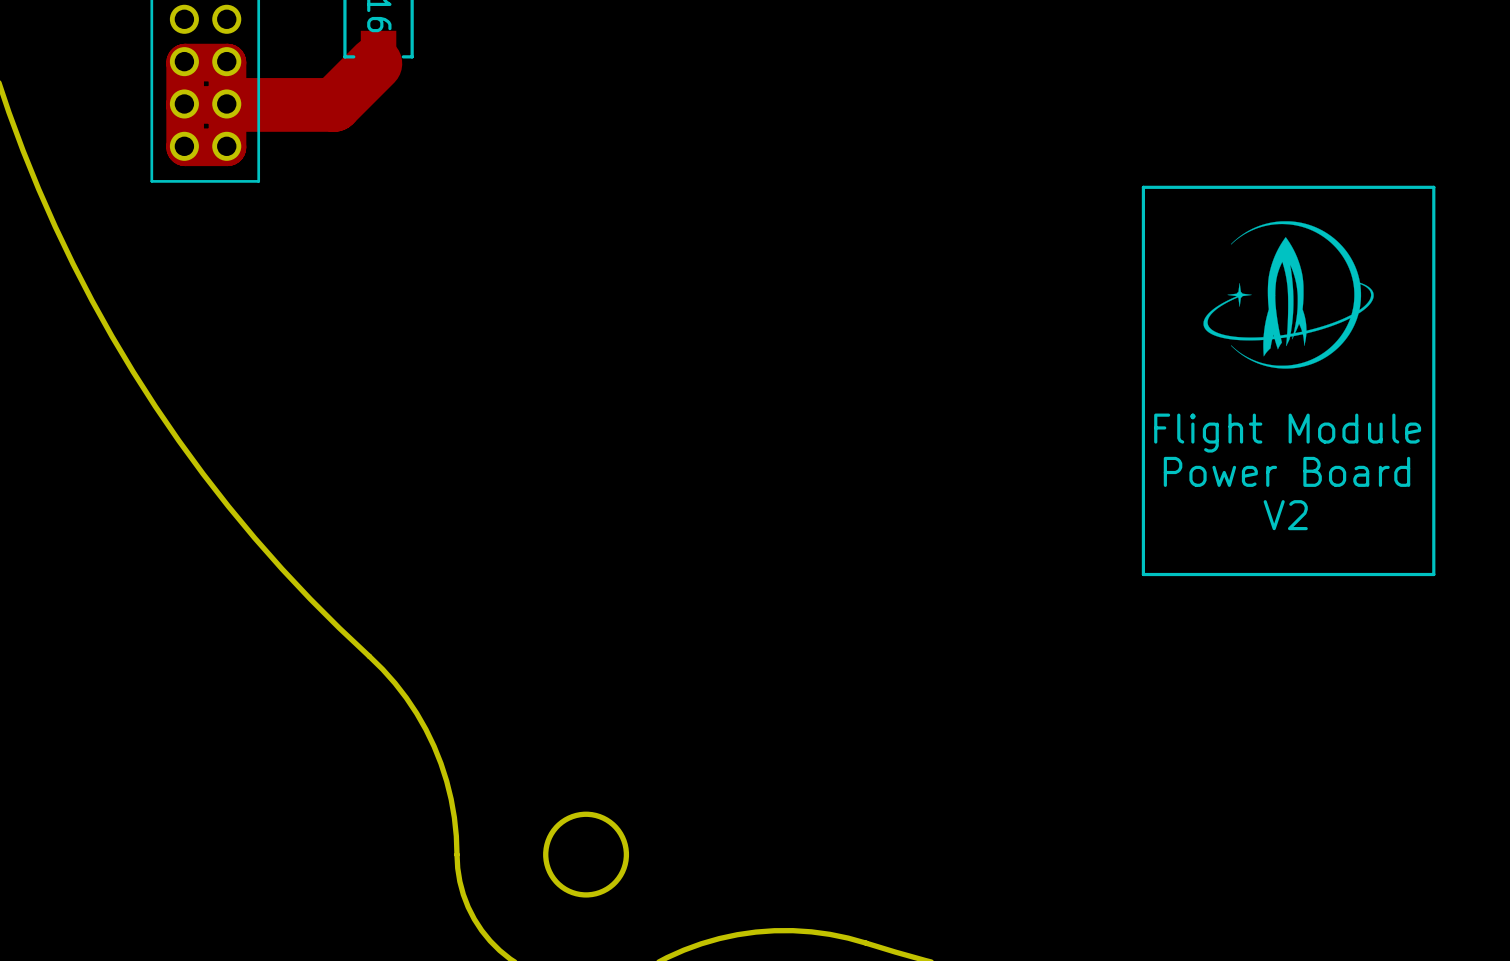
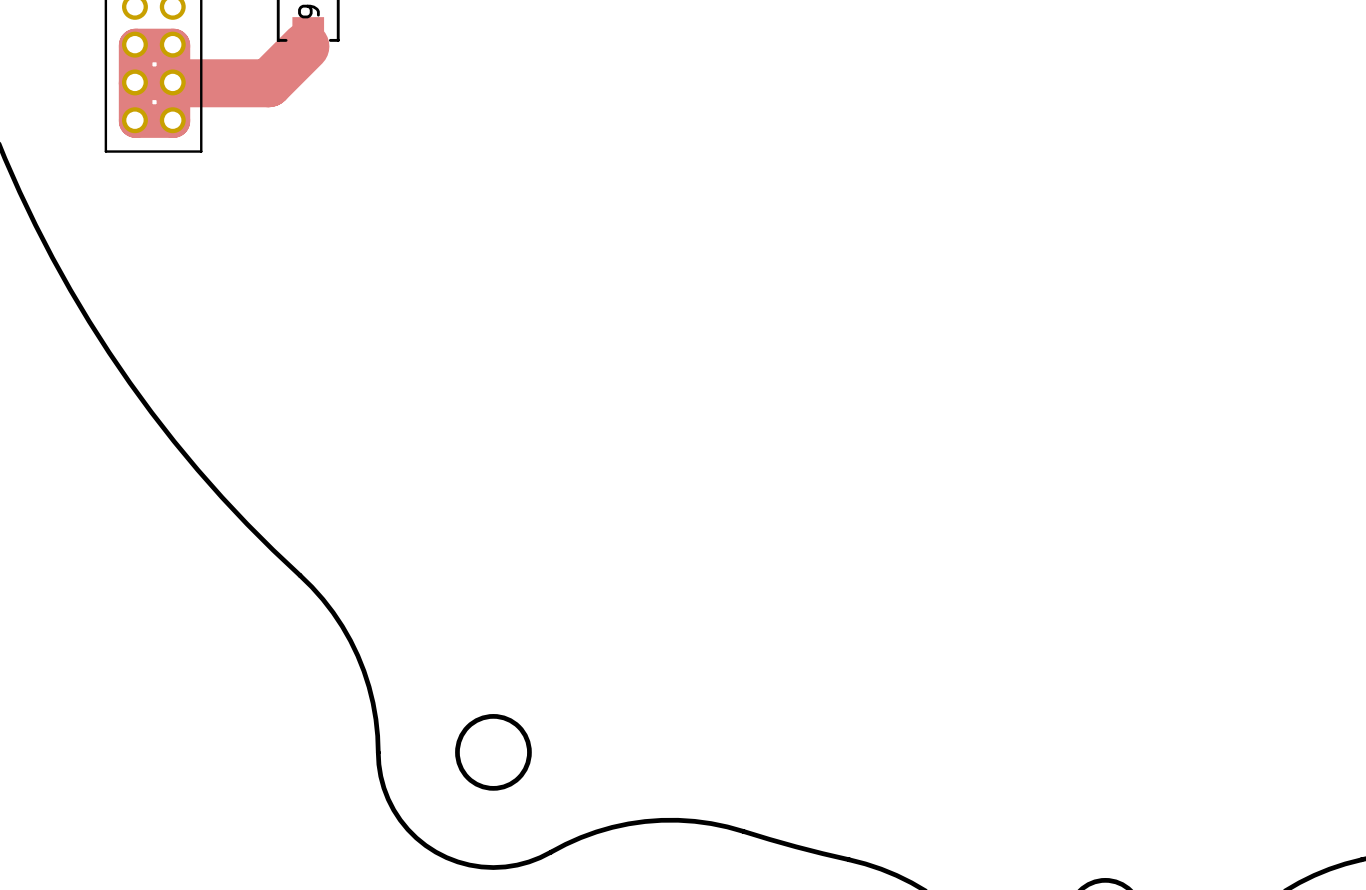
line: (1143, 187) (1433, 187) (1433, 574) (1143, 574) (1143, 187) -> none
drawing: [1203, 221, 1374, 369] -> none
text: Flight Module (1287, 433) -> none
text: Power Board (1286, 471) -> none
text: V2 (1285, 515) -> none

